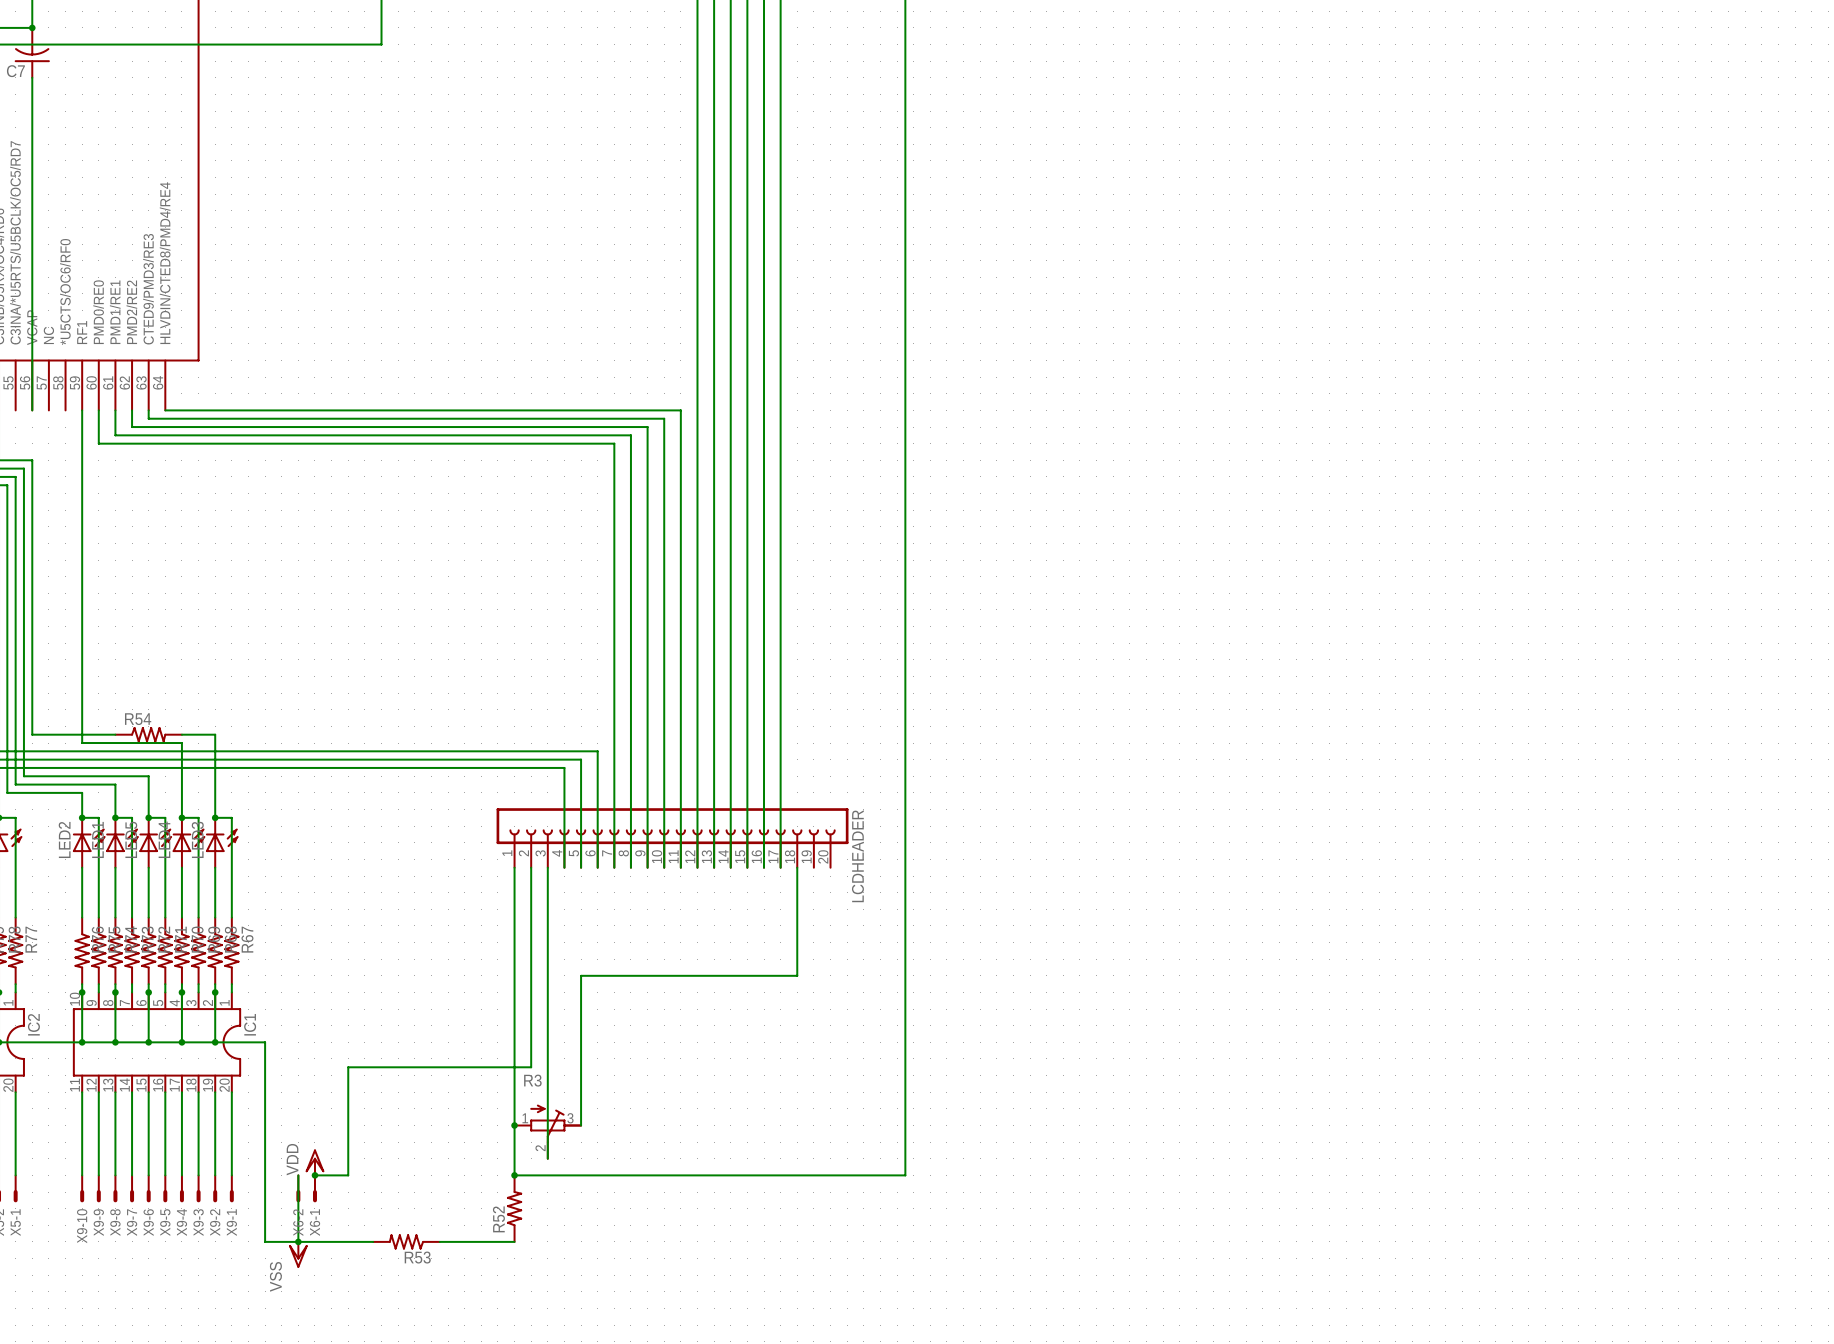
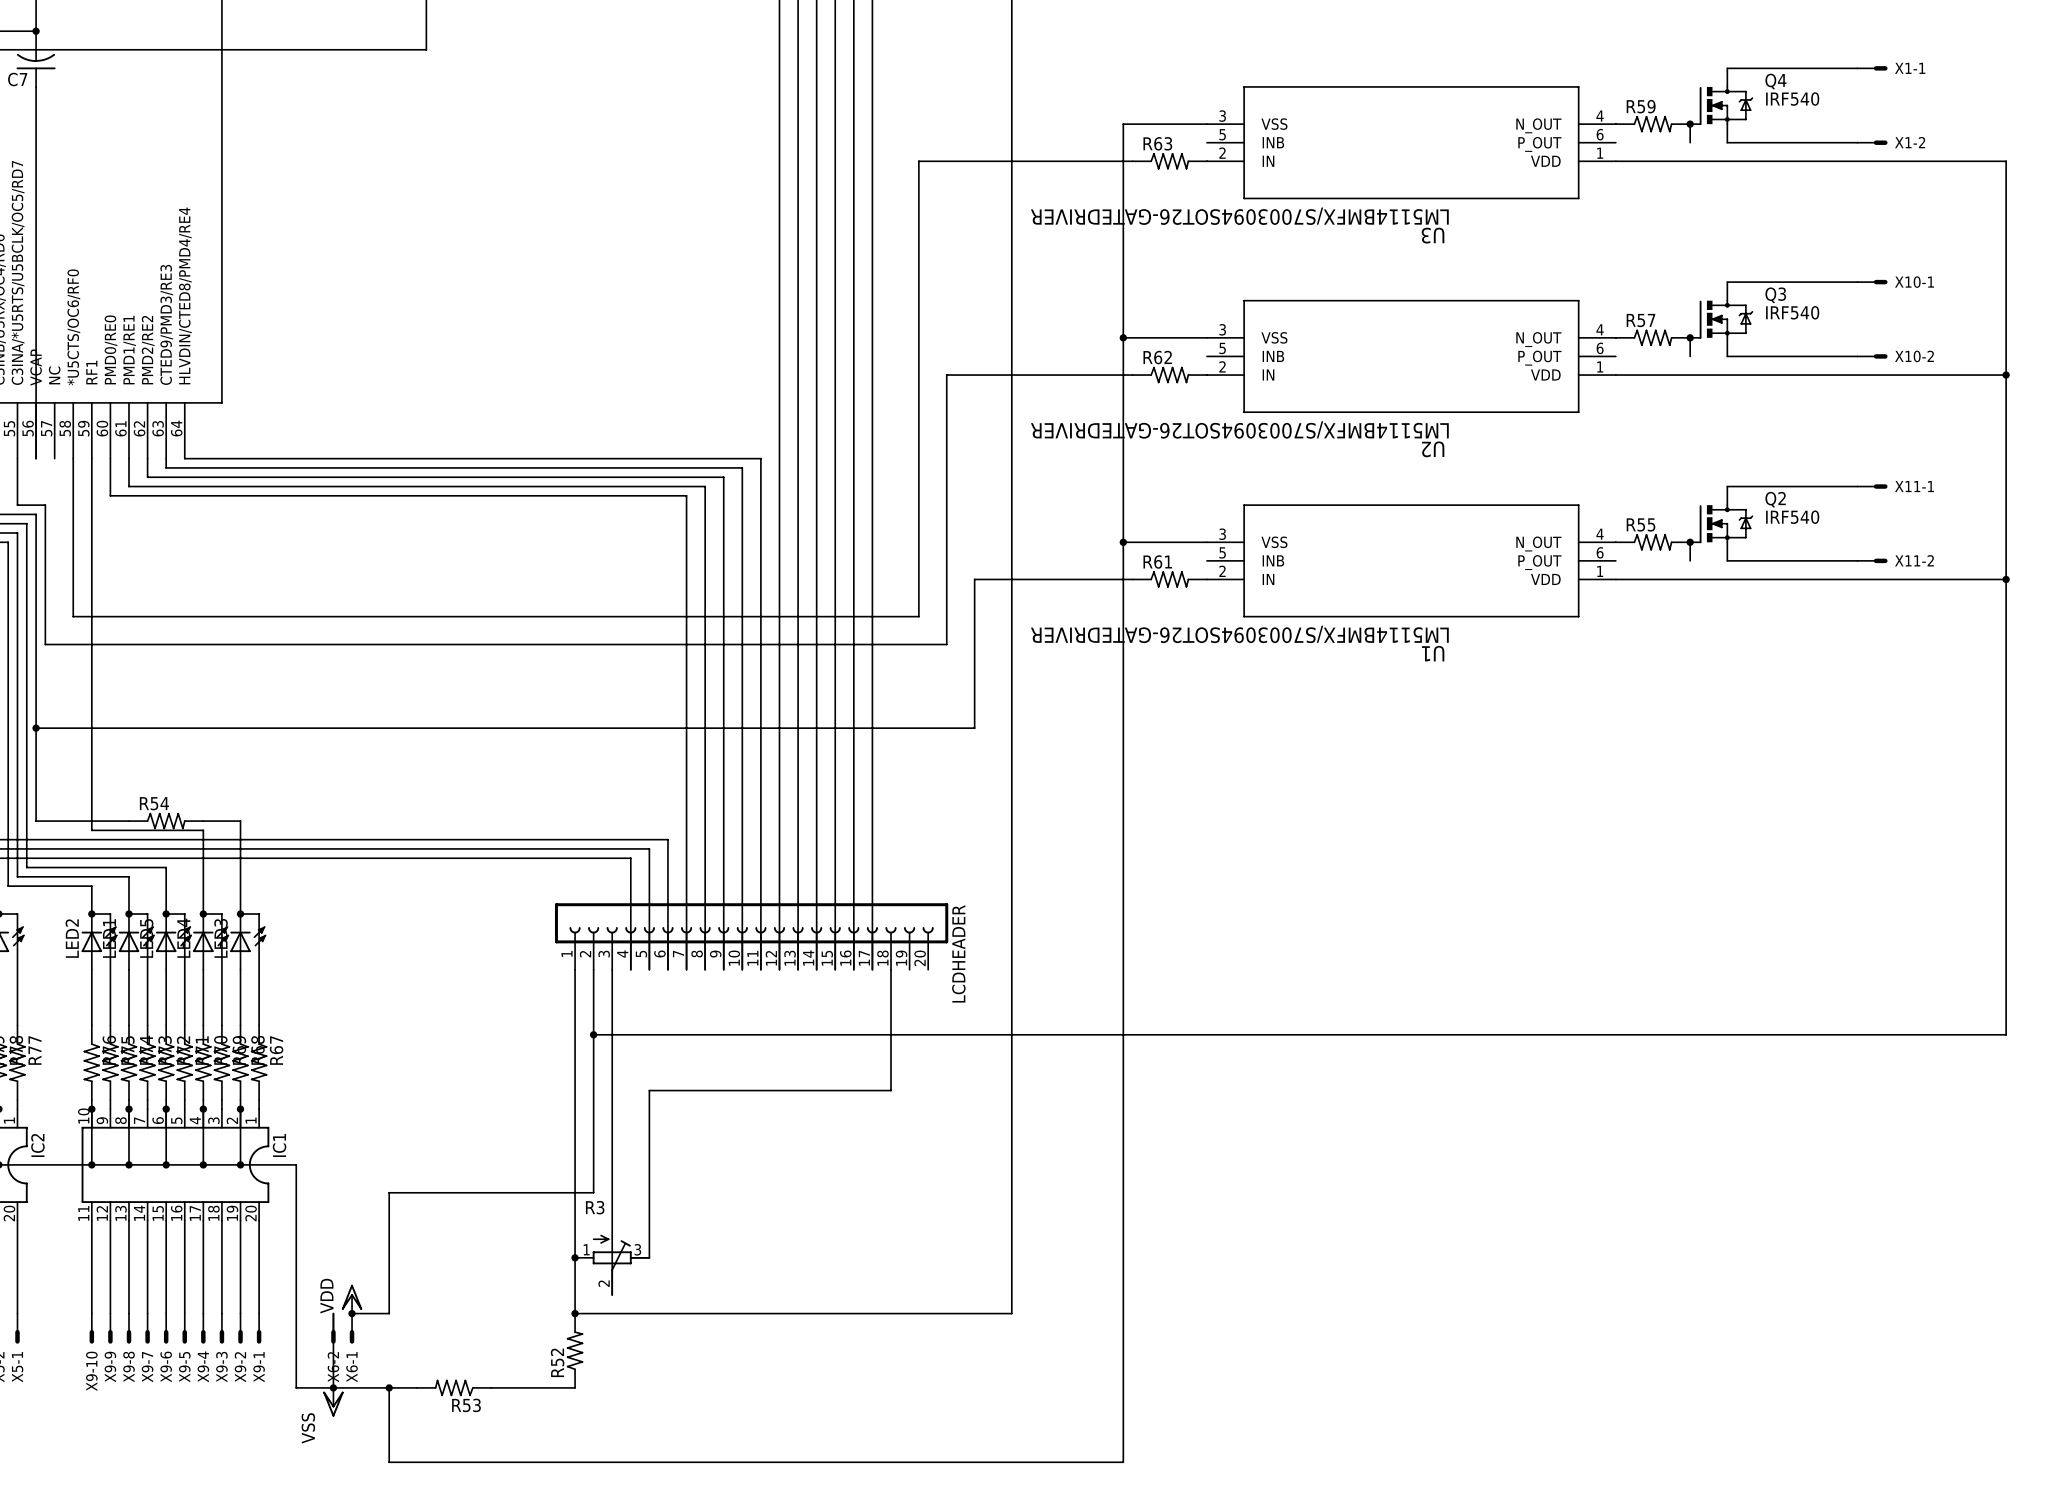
wire: none -> (1727, 68) (1857, 68)
X1-1: none -> (1872, 68)
Q4: none -> IRF540 (1721, 105)
wire: none -> (1206, 124) (1123, 124) (1123, 1462) (389, 1462) (389, 1387)
R59: none -> (1653, 124)
wire: none -> (1690, 124) (1690, 142)
junction: none -> (1690, 124)
U3: none -> LM5114BMFX/S7003094SOT26-GATEDRIVER (1411, 142)
wire: none -> (1727, 142) (1857, 142)
X1-2: none -> (1872, 142)
wire: none -> (1132, 161) (918, 161) (918, 616) (73, 616) (73, 458)
R63: none -> (1169, 161)
wire: none -> (1615, 161) (2006, 161) (2006, 1034) (593, 1034)
wire: none -> (1727, 282) (1857, 282)
X10-1: none -> (1872, 282)
Q3: none -> IRF540 (1721, 319)
wire: none -> (1123, 337) (1206, 337)
junction: none -> (1123, 337)
R57: none -> (1653, 337)
wire: none -> (1690, 337) (1690, 356)
junction: none -> (1690, 337)
U2: none -> LM5114BMFX/S7003094SOT26-GATEDRIVER (1411, 356)
wire: none -> (1727, 356) (1857, 356)
X10-2: none -> (1872, 356)
wire: none -> (1132, 375) (946, 375) (946, 644) (45, 644) (45, 505) (17, 505) (17, 458)
R62: none -> (1169, 375)
wire: none -> (1615, 375) (2006, 375)
junction: none -> (2006, 375)
wire: none -> (1727, 486) (1857, 486)
X11-1: none -> (1872, 486)
Q2: none -> IRF540 (1721, 523)
wire: none -> (1123, 542) (1206, 542)
junction: none -> (1123, 542)
R55: none -> (1653, 542)
wire: none -> (1690, 542) (1690, 560)
junction: none -> (1690, 542)
U1: none -> LM5114BMFX/S7003094SOT26-GATEDRIVER (1411, 560)
wire: none -> (1727, 560) (1857, 560)
X11-2: none -> (1872, 560)
wire: none -> (1132, 579) (974, 579) (974, 728) (36, 728)
R61: none -> (1169, 579)
wire: none -> (1615, 579) (2006, 579)
junction: none -> (2006, 579)
junction: none -> (36, 728)
junction: none -> (593, 1034)
junction: none -> (389, 1387)

